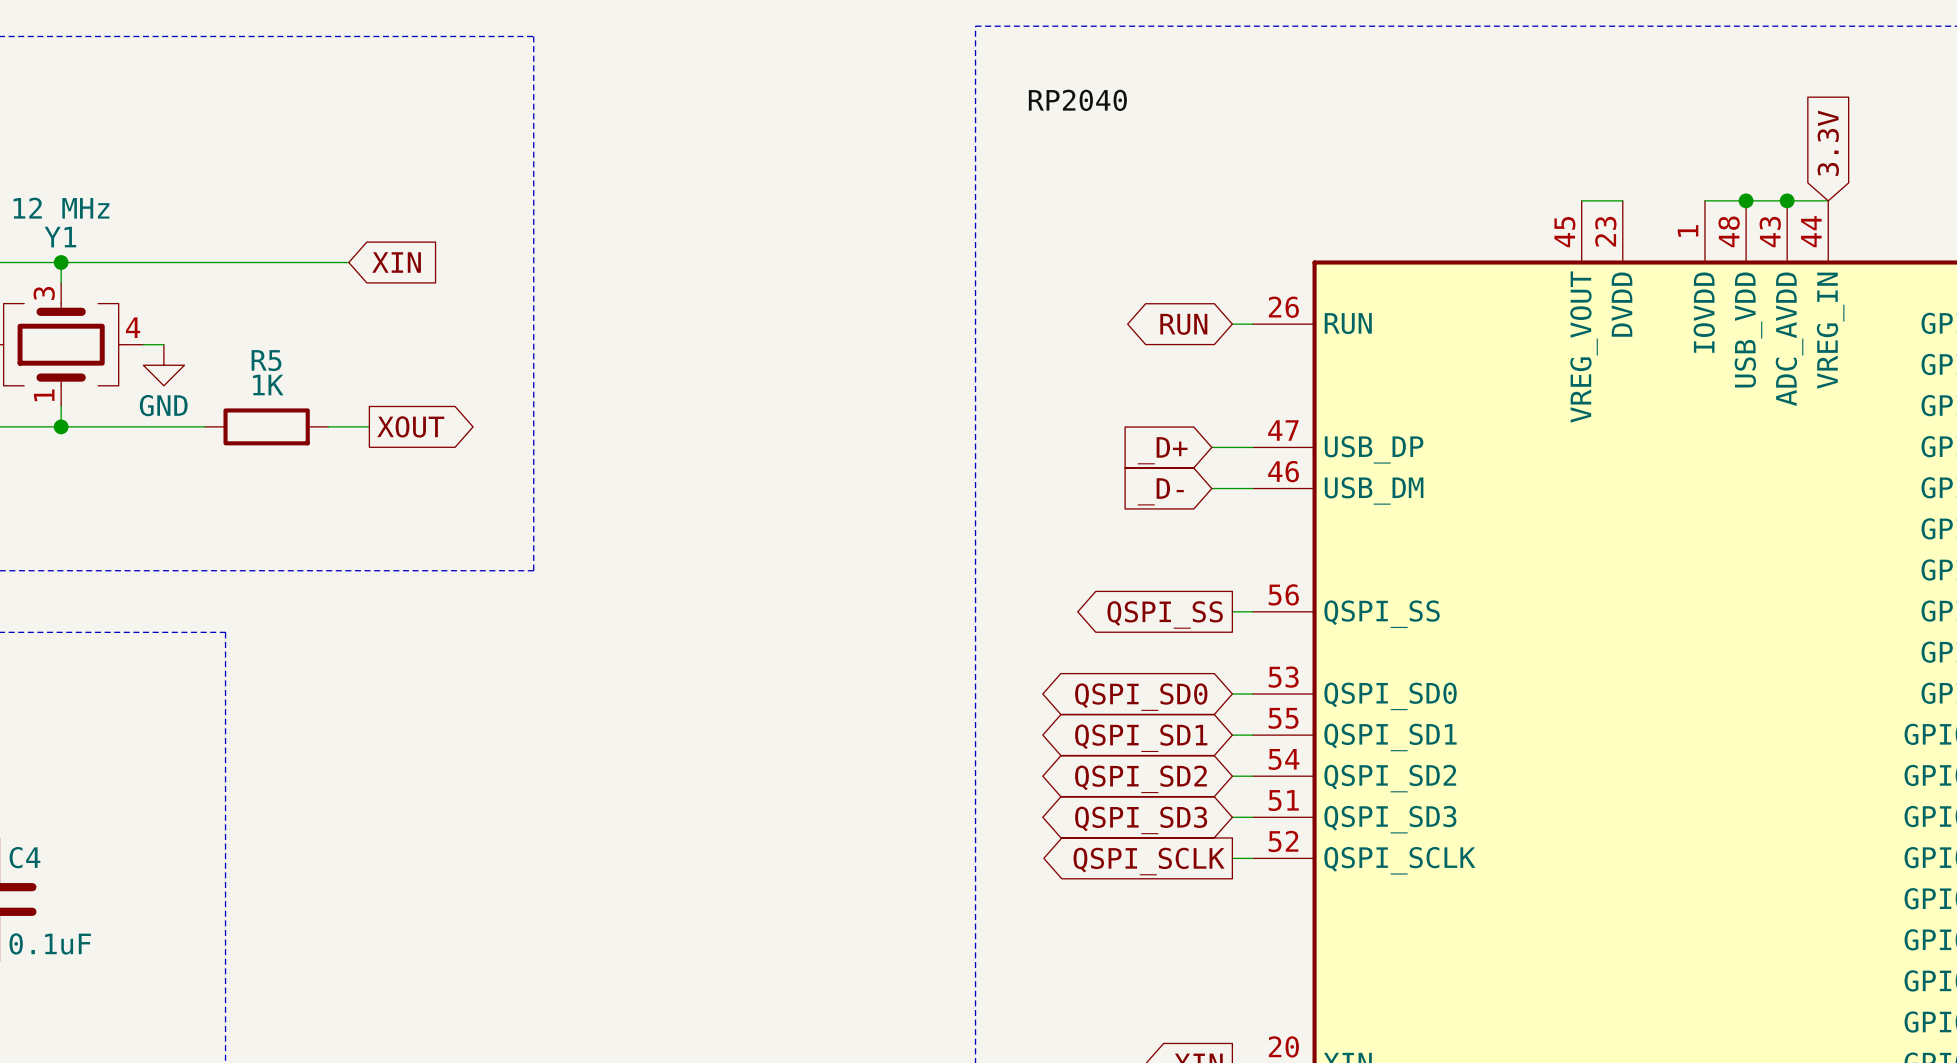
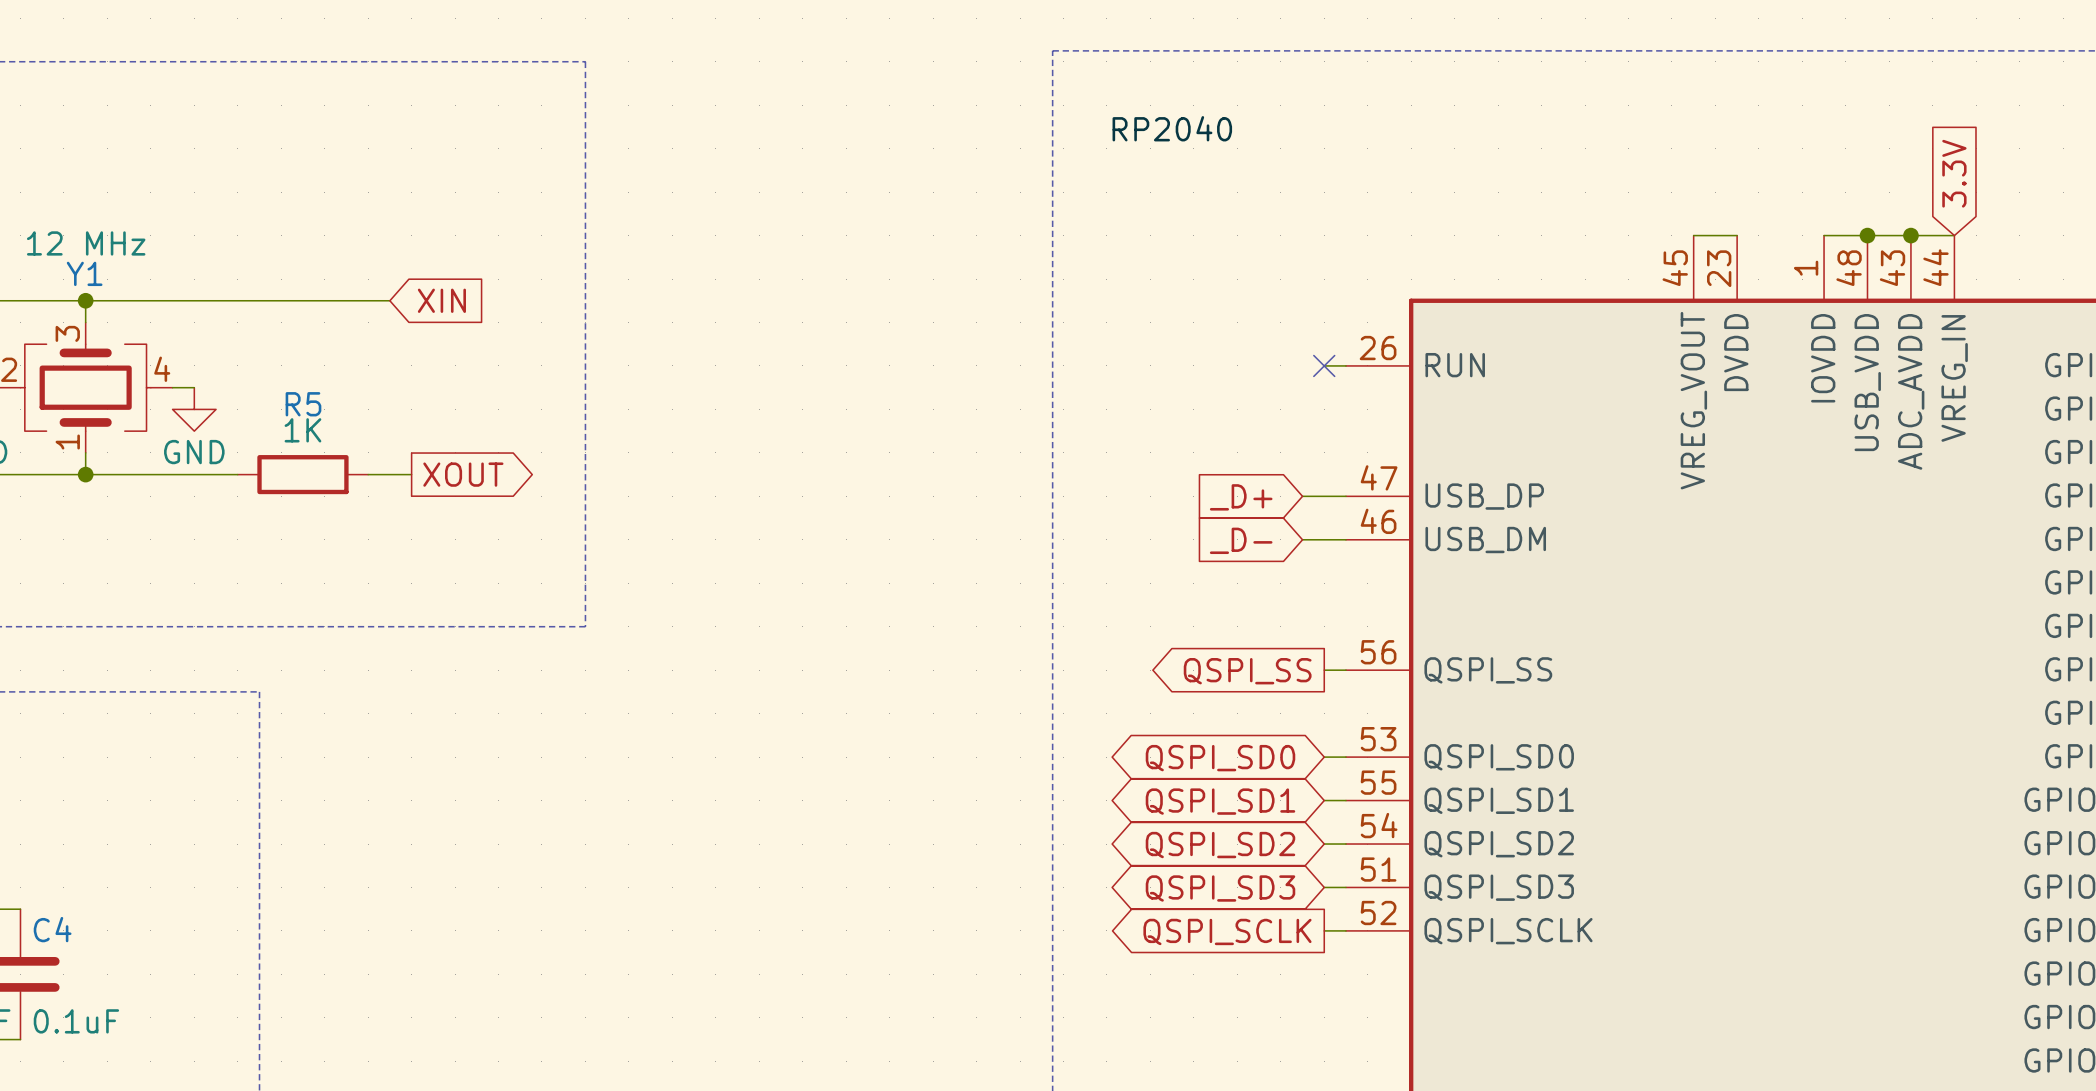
global label: RUN (1183, 324) -> none
no-connect mark: none -> (1324, 365)

